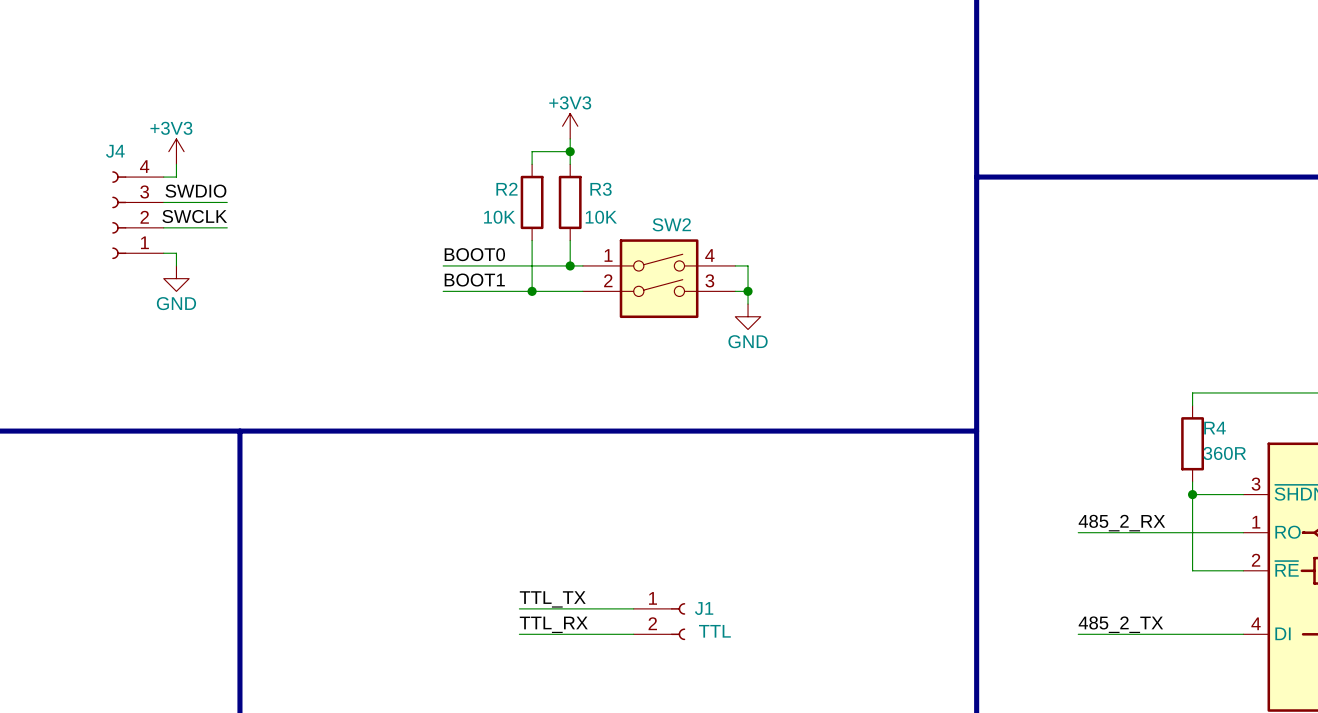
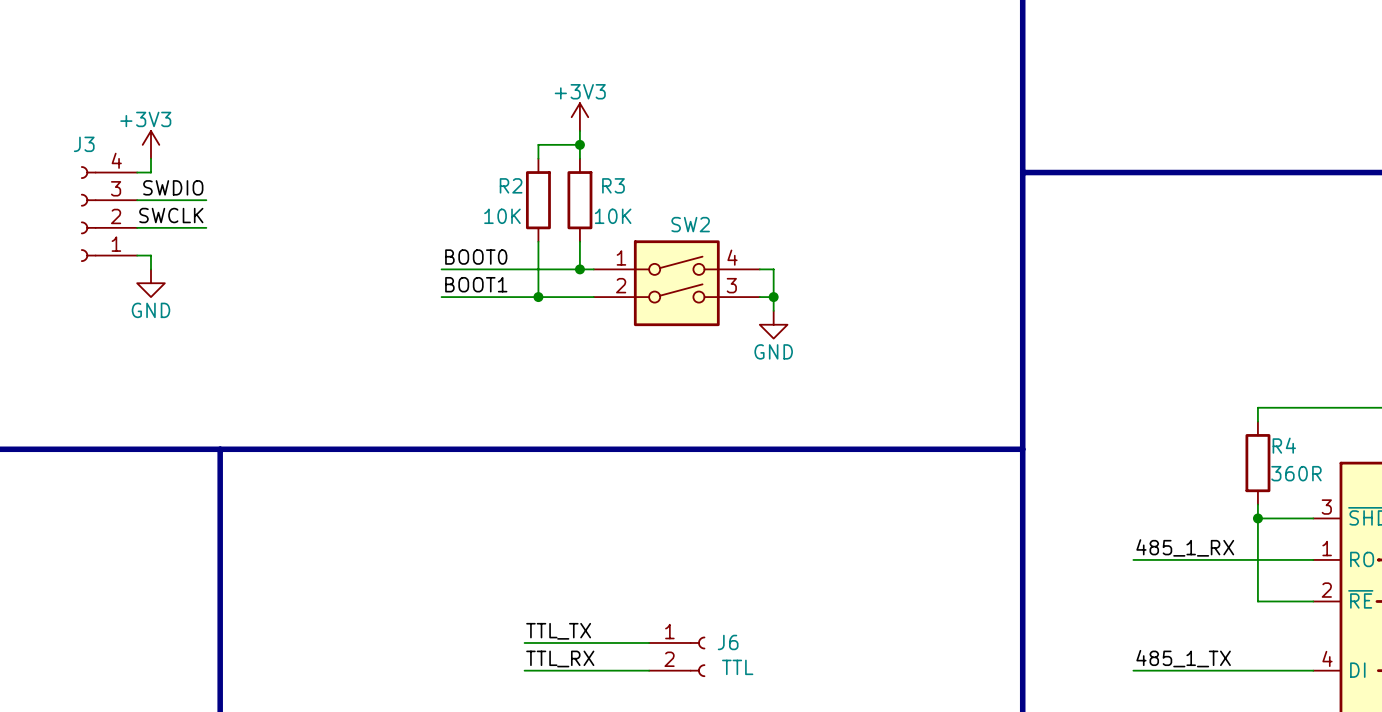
J4 name: J4 (115, 151) -> J3 (84, 144)
label: 485_2_RX (1121, 523) -> 485_1_RX (1185, 547)
J1 name: J1 (704, 608) -> J6 (728, 642)
label: 485_2_TX (1120, 624) -> 485_1_TX (1183, 658)

